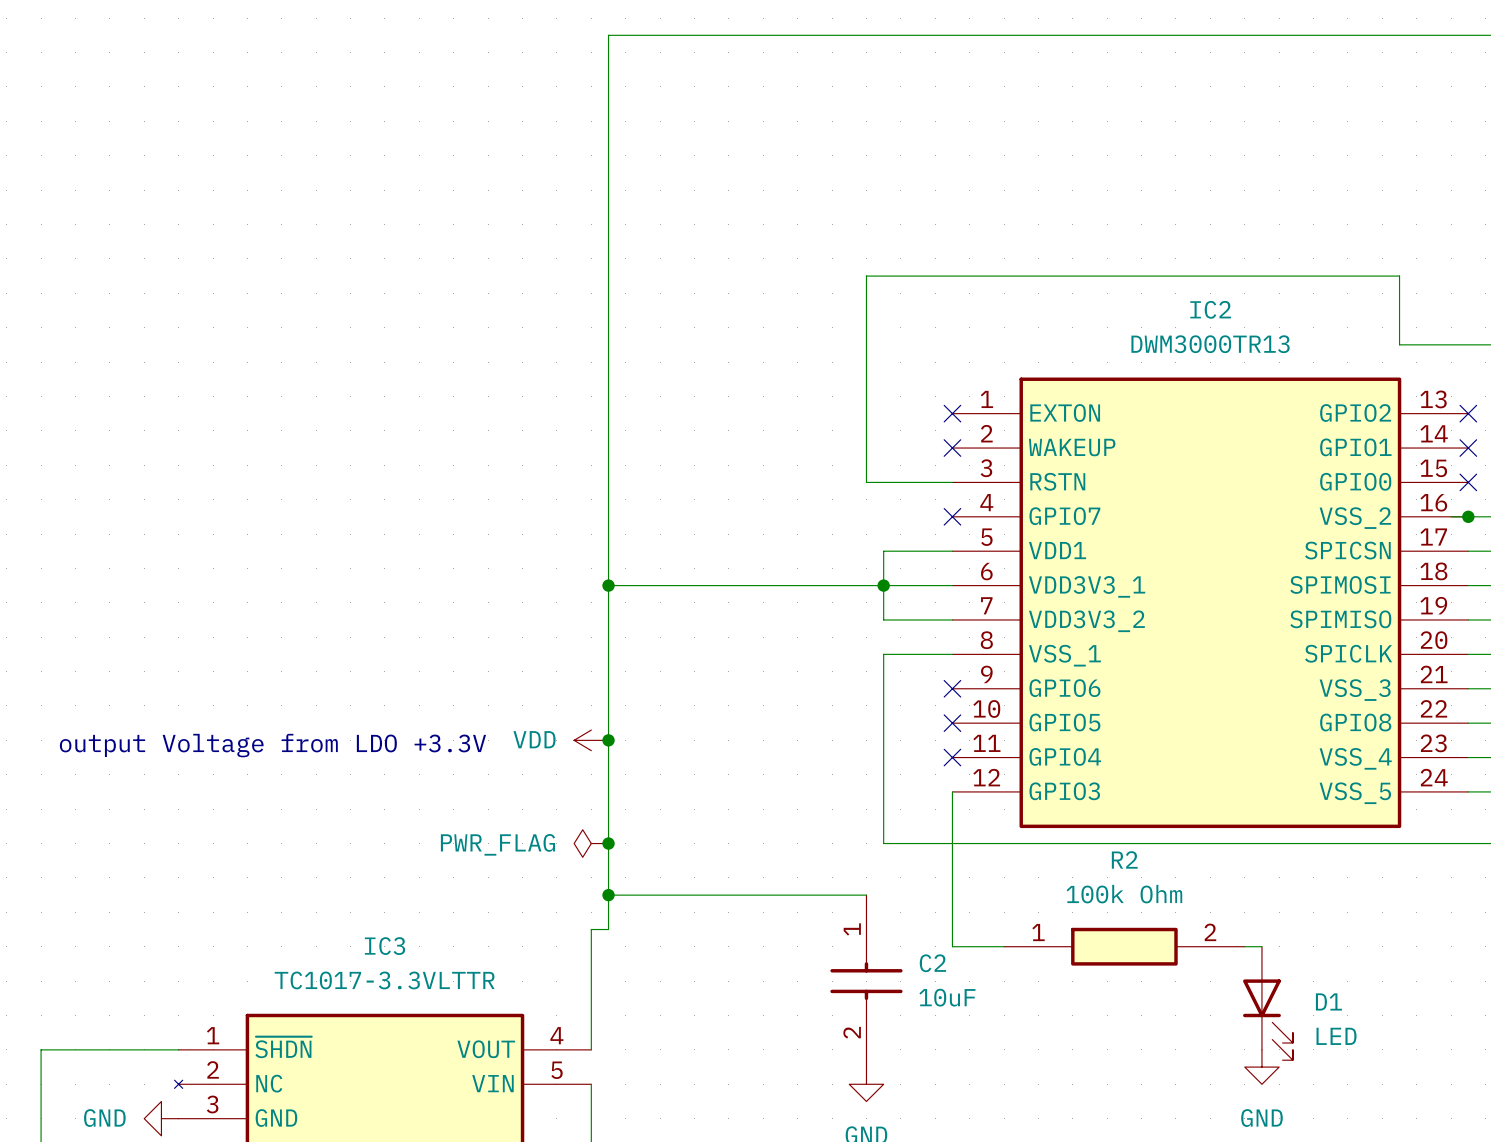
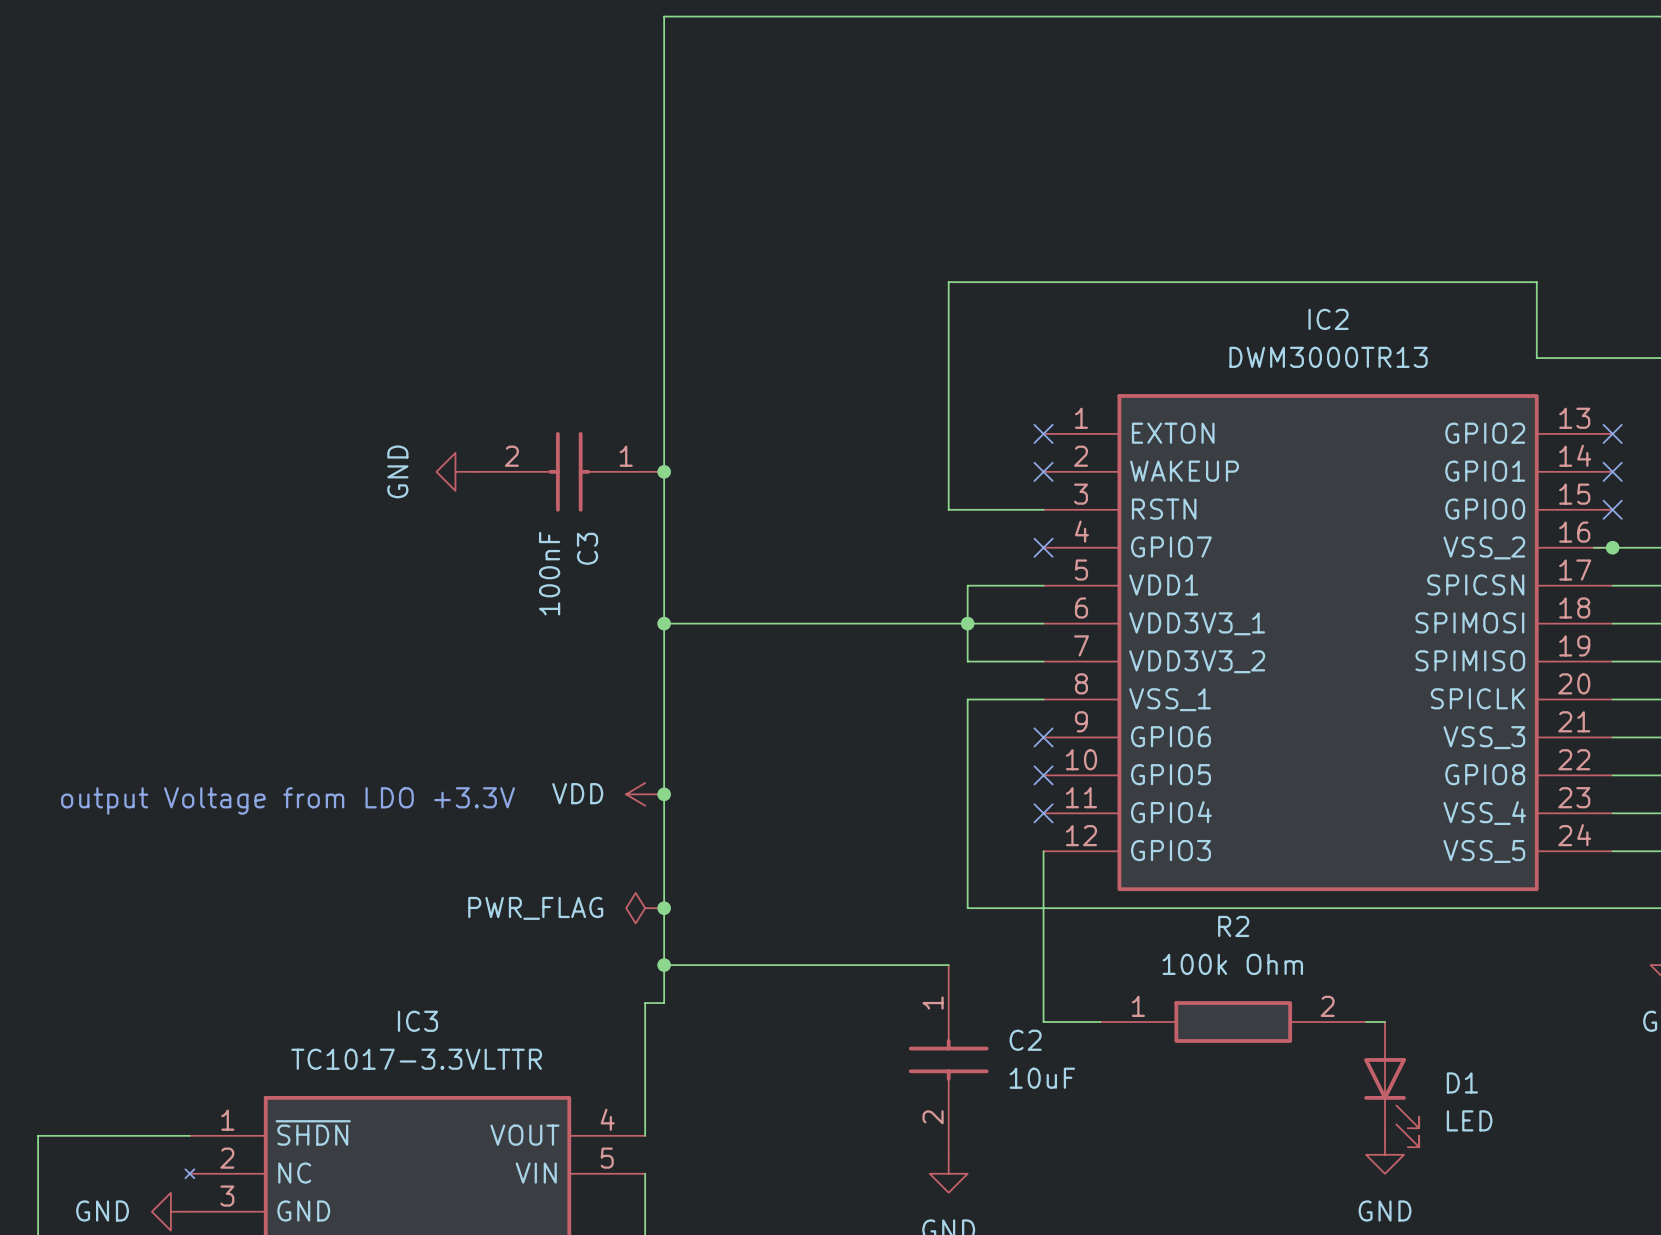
power symbol: none -> GND (455, 471)
C3: none -> 100nF (569, 471)
junction: none -> (664, 471)

